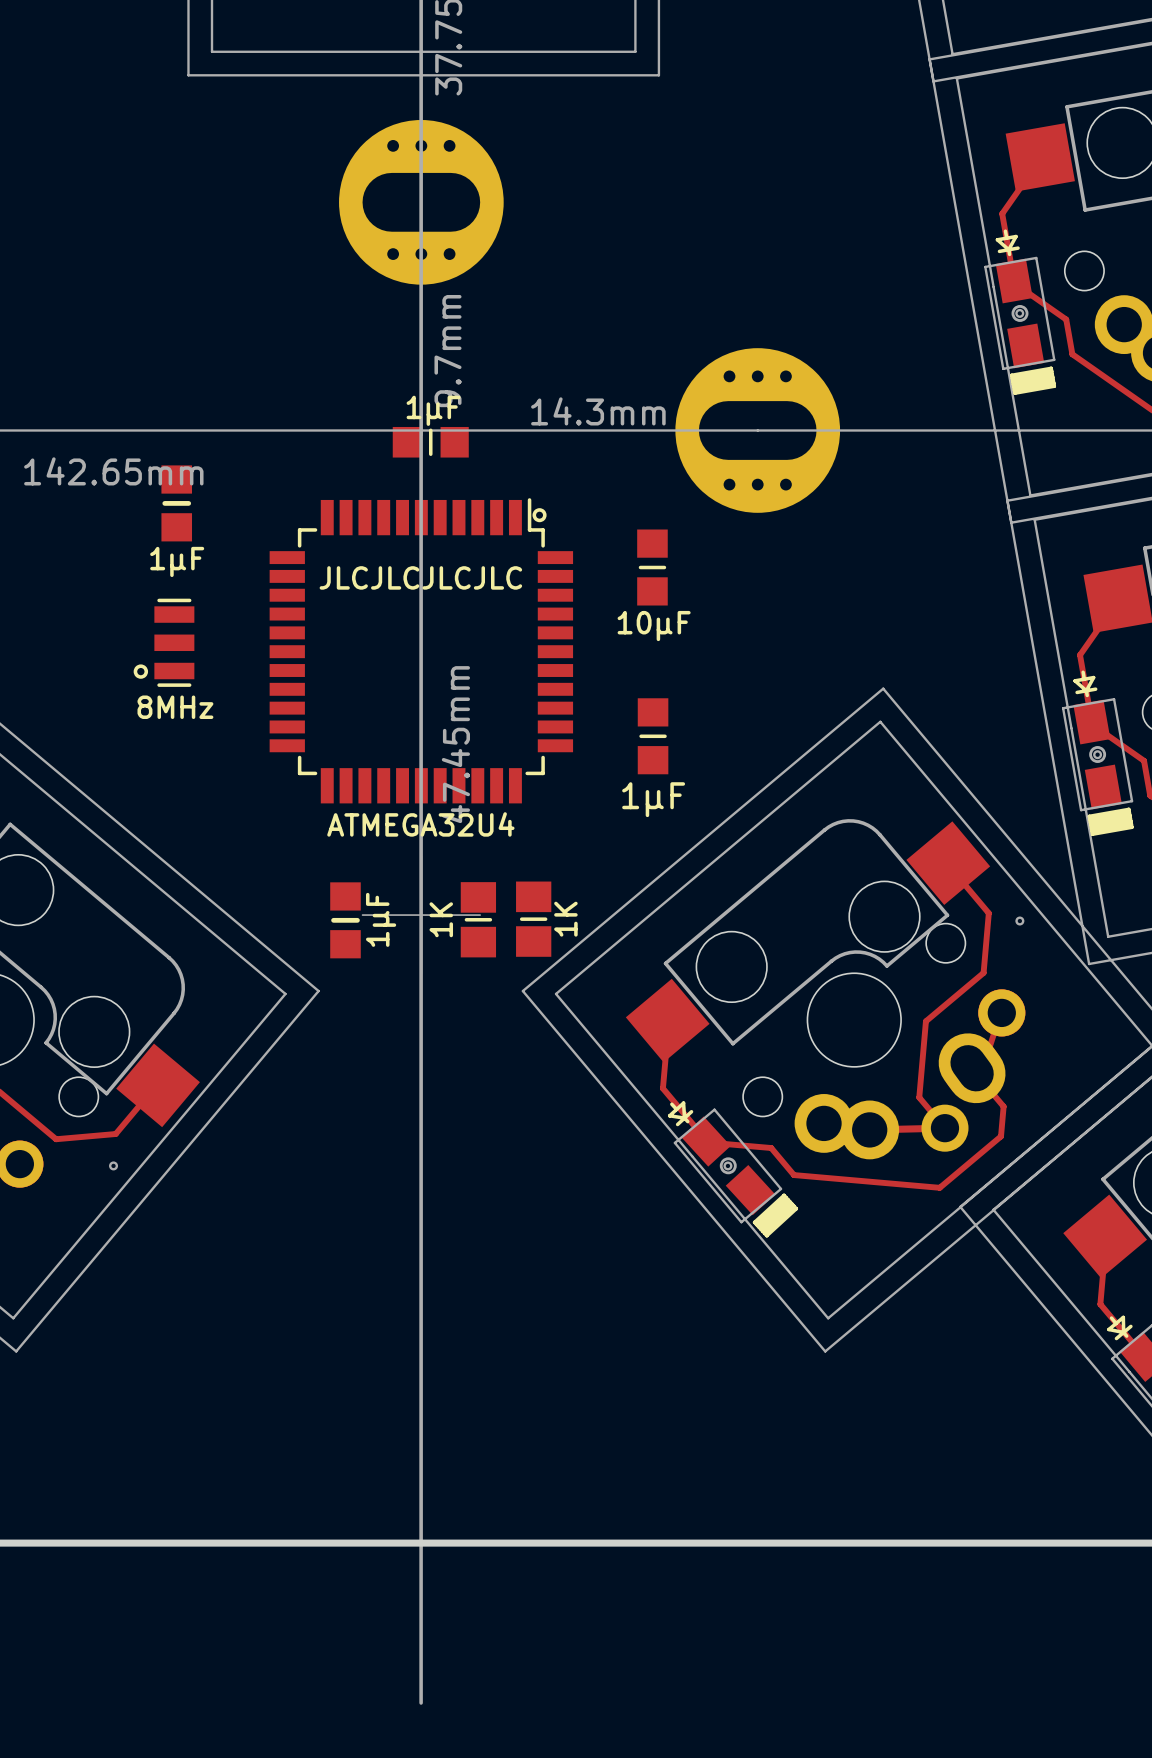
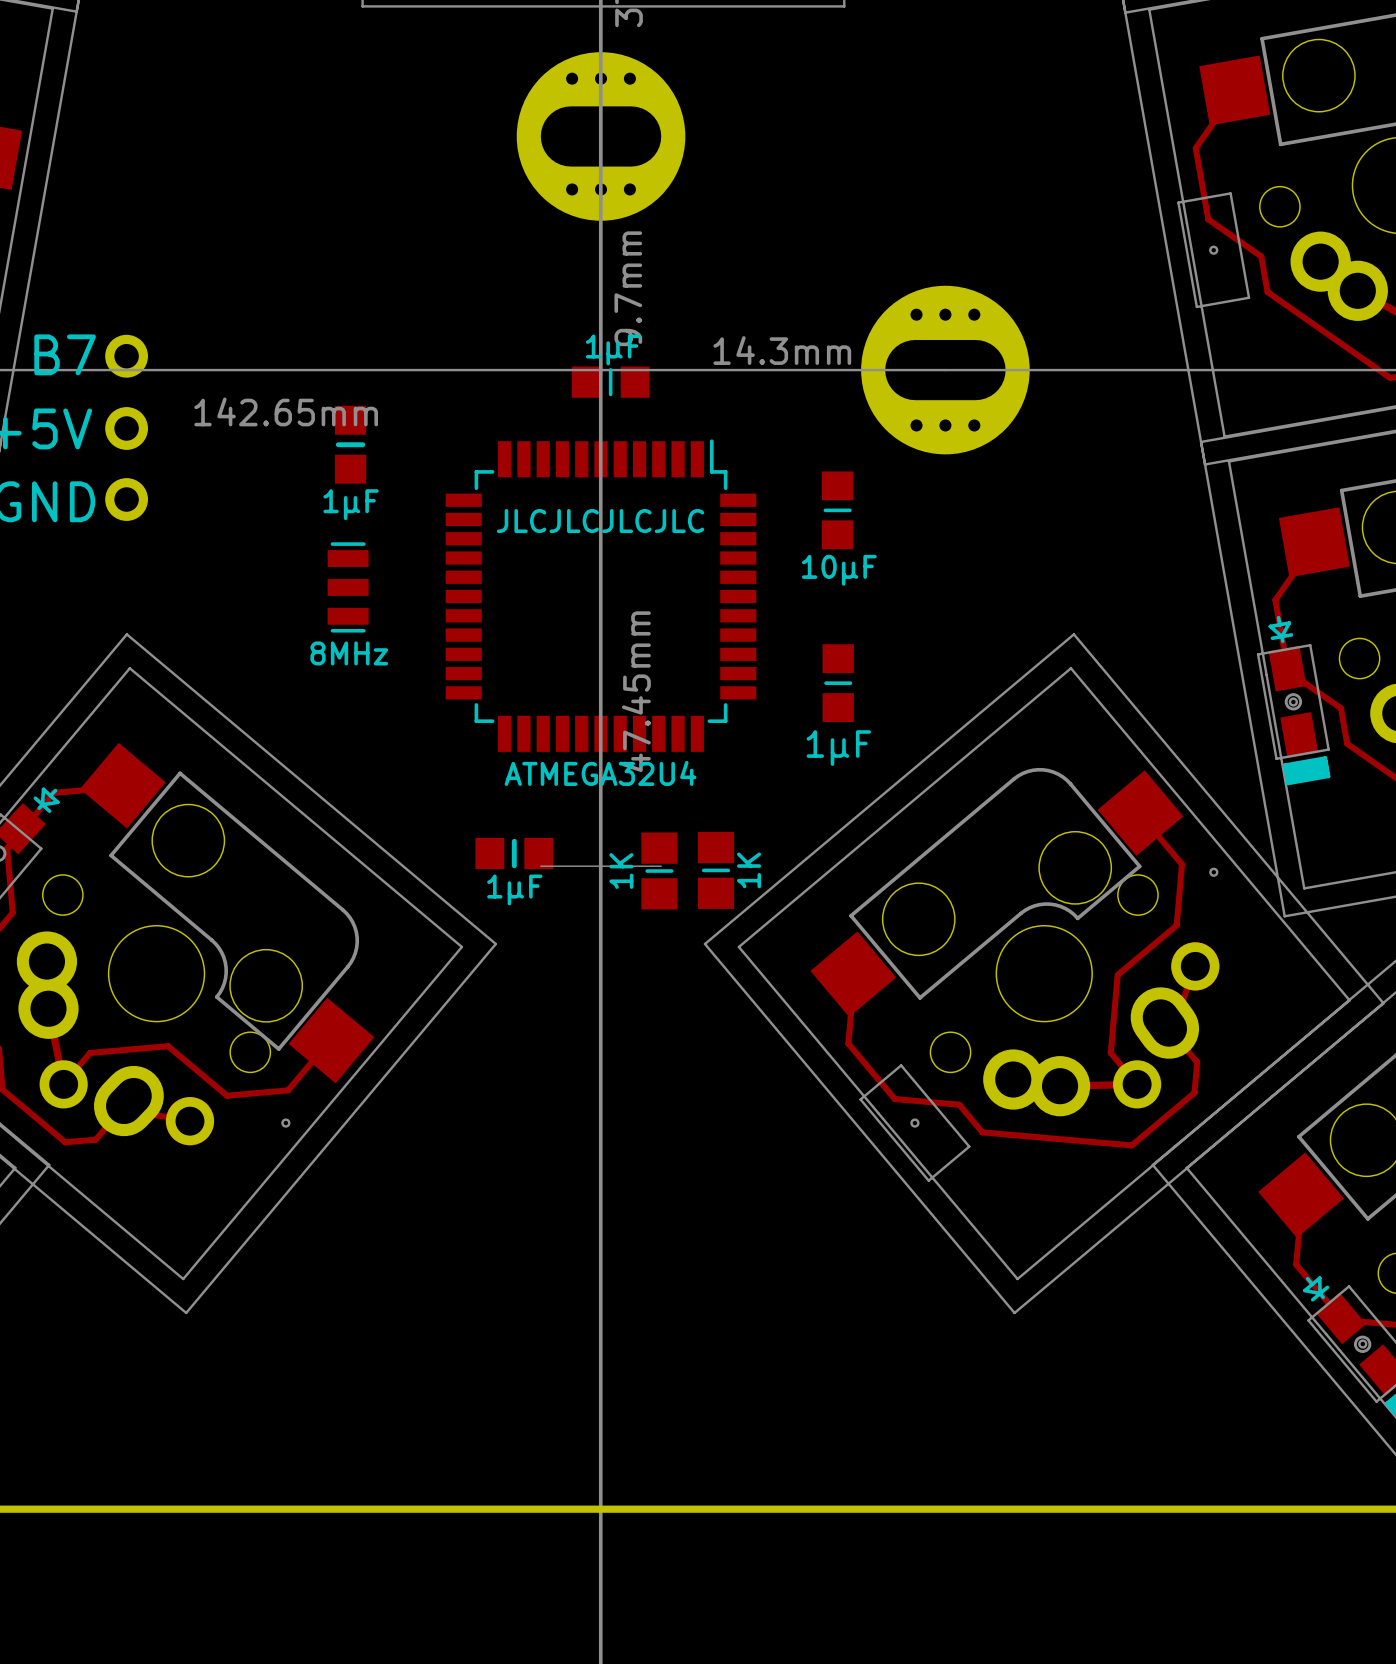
part: (1025, 312) -> none
drawing: [532, 508, 547, 523] -> none
drawing: [133, 664, 149, 679] -> none
part rotation: 0° (345, 920) -> 90° clockwise (514, 853)
part: (733, 1169) -> none

